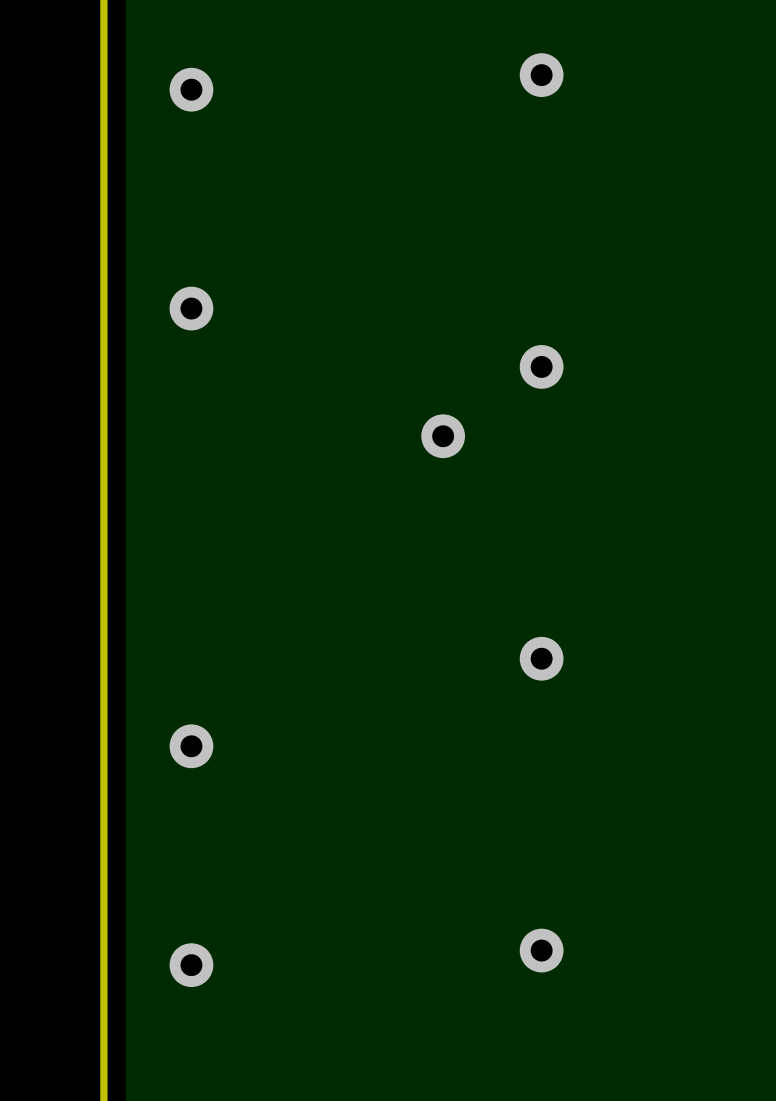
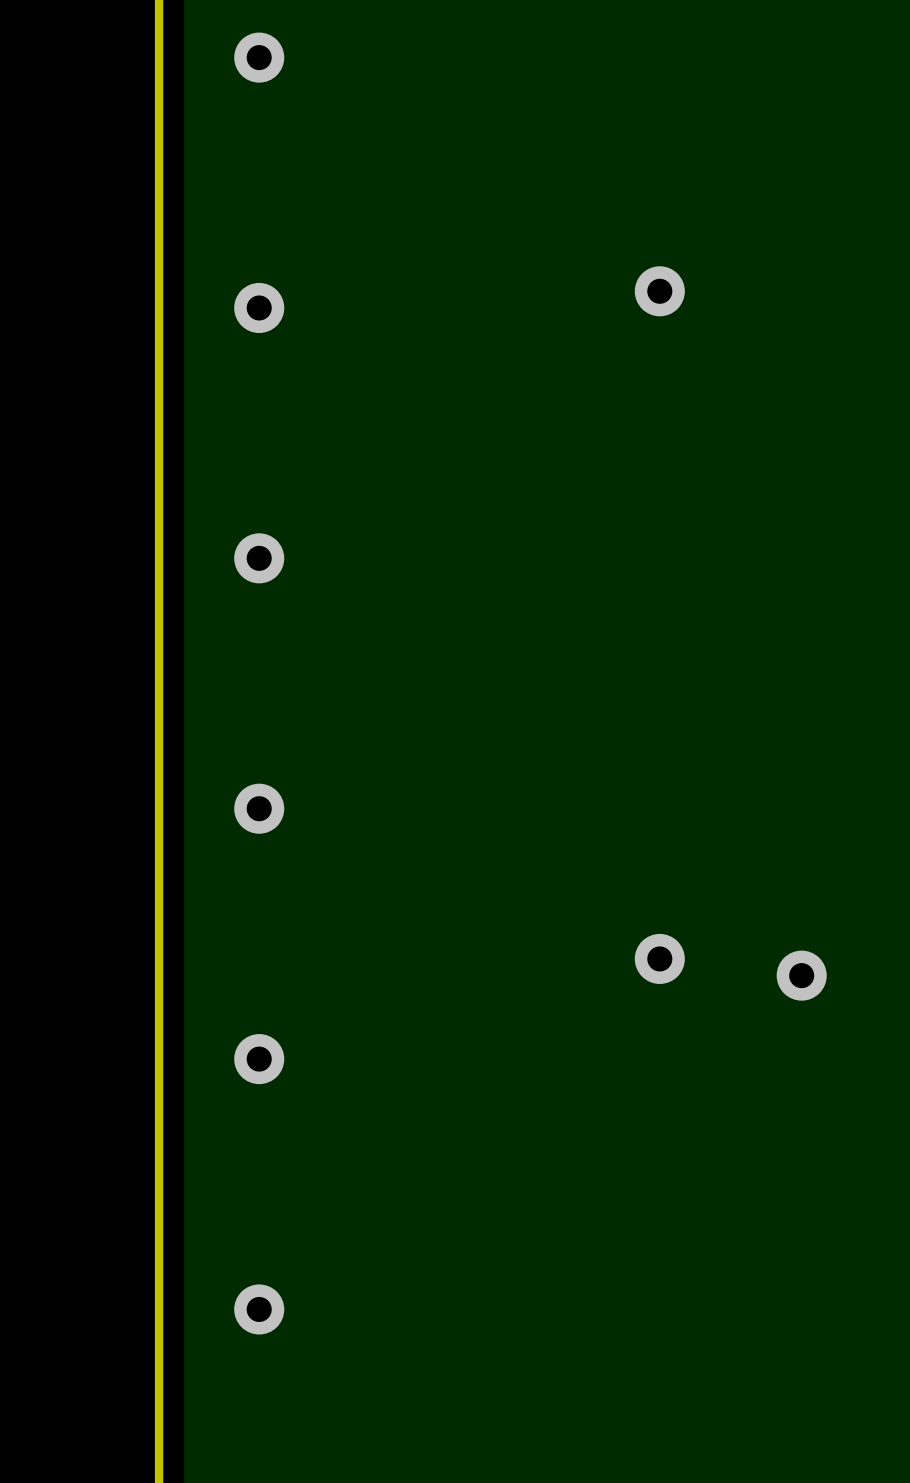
via: (541, 366) -> none
via: (443, 436) -> none
via: none -> (259, 808)
via: none -> (801, 975)
via: (541, 950) -> none

